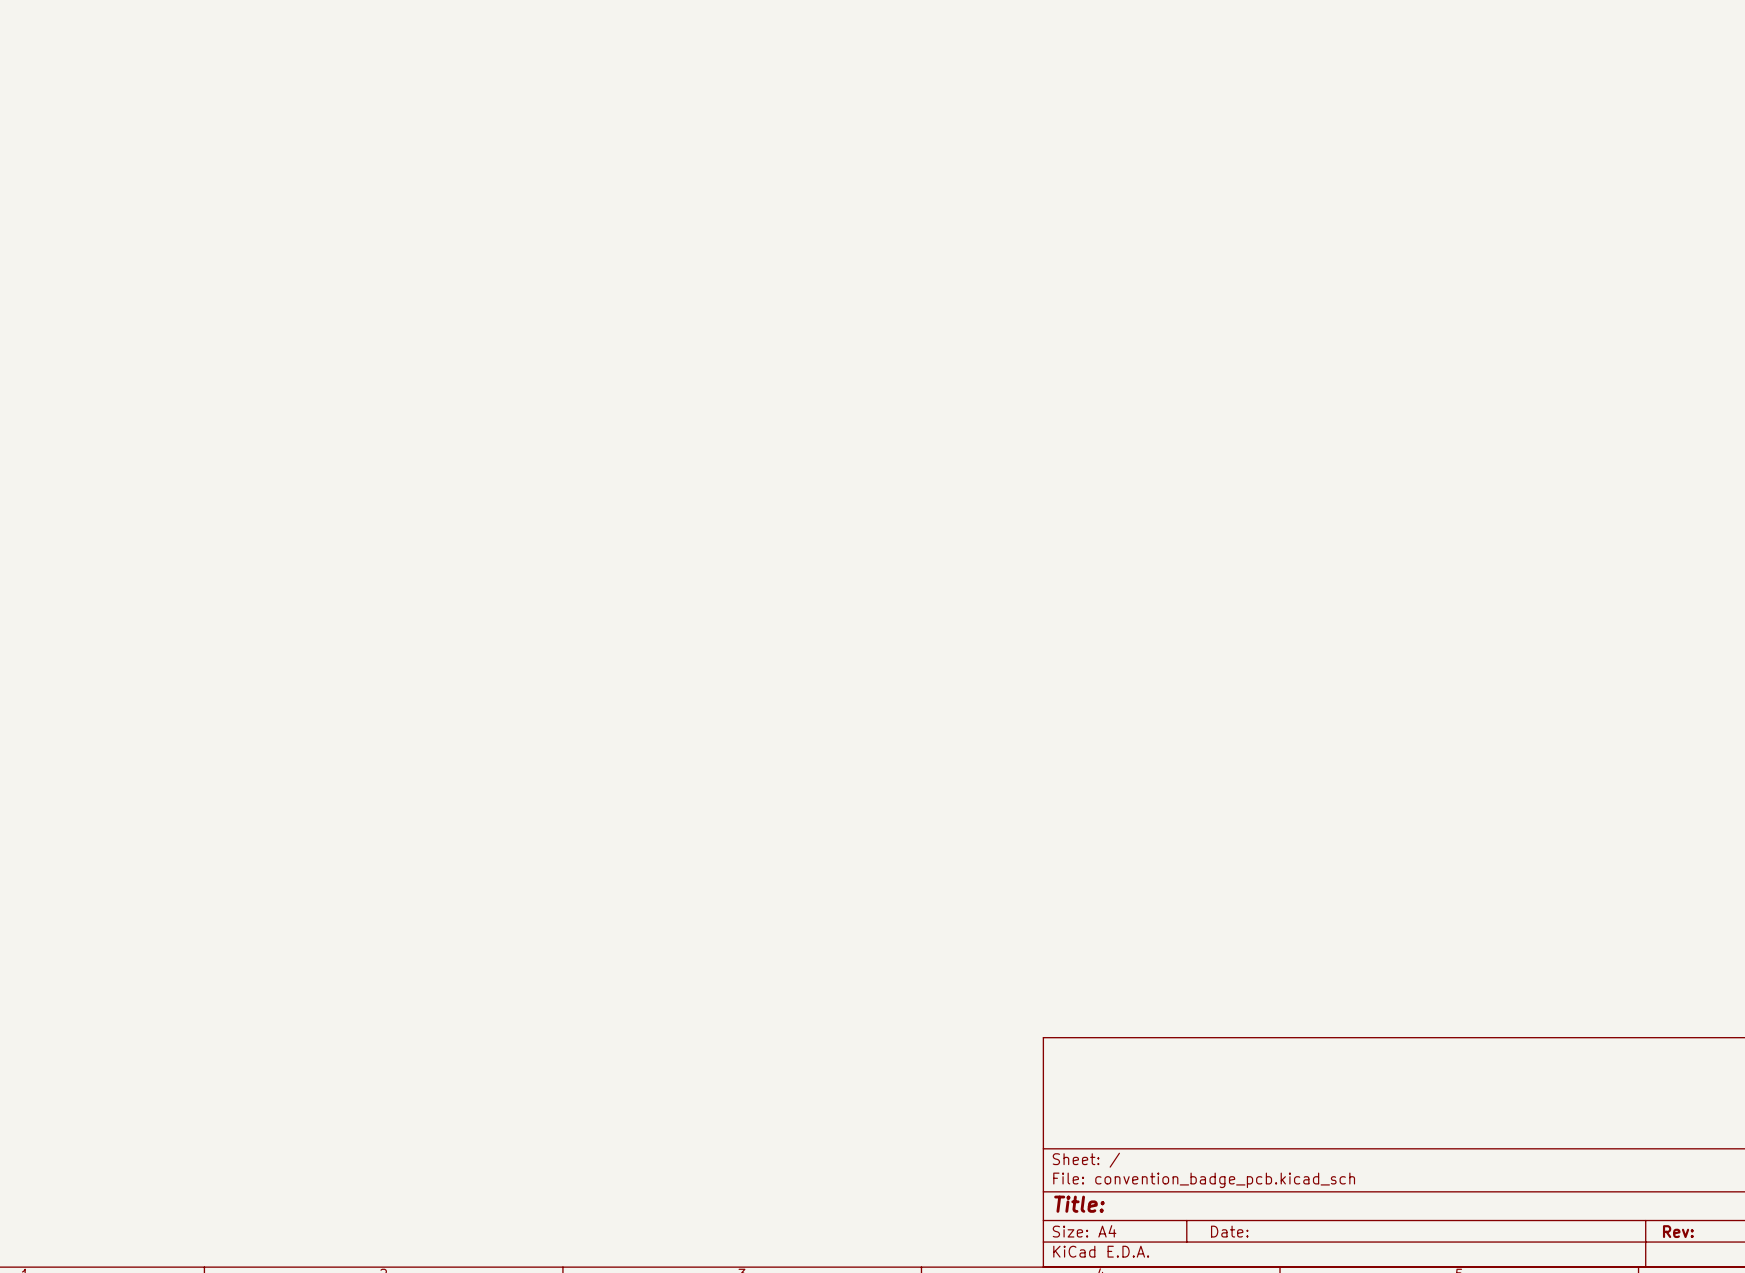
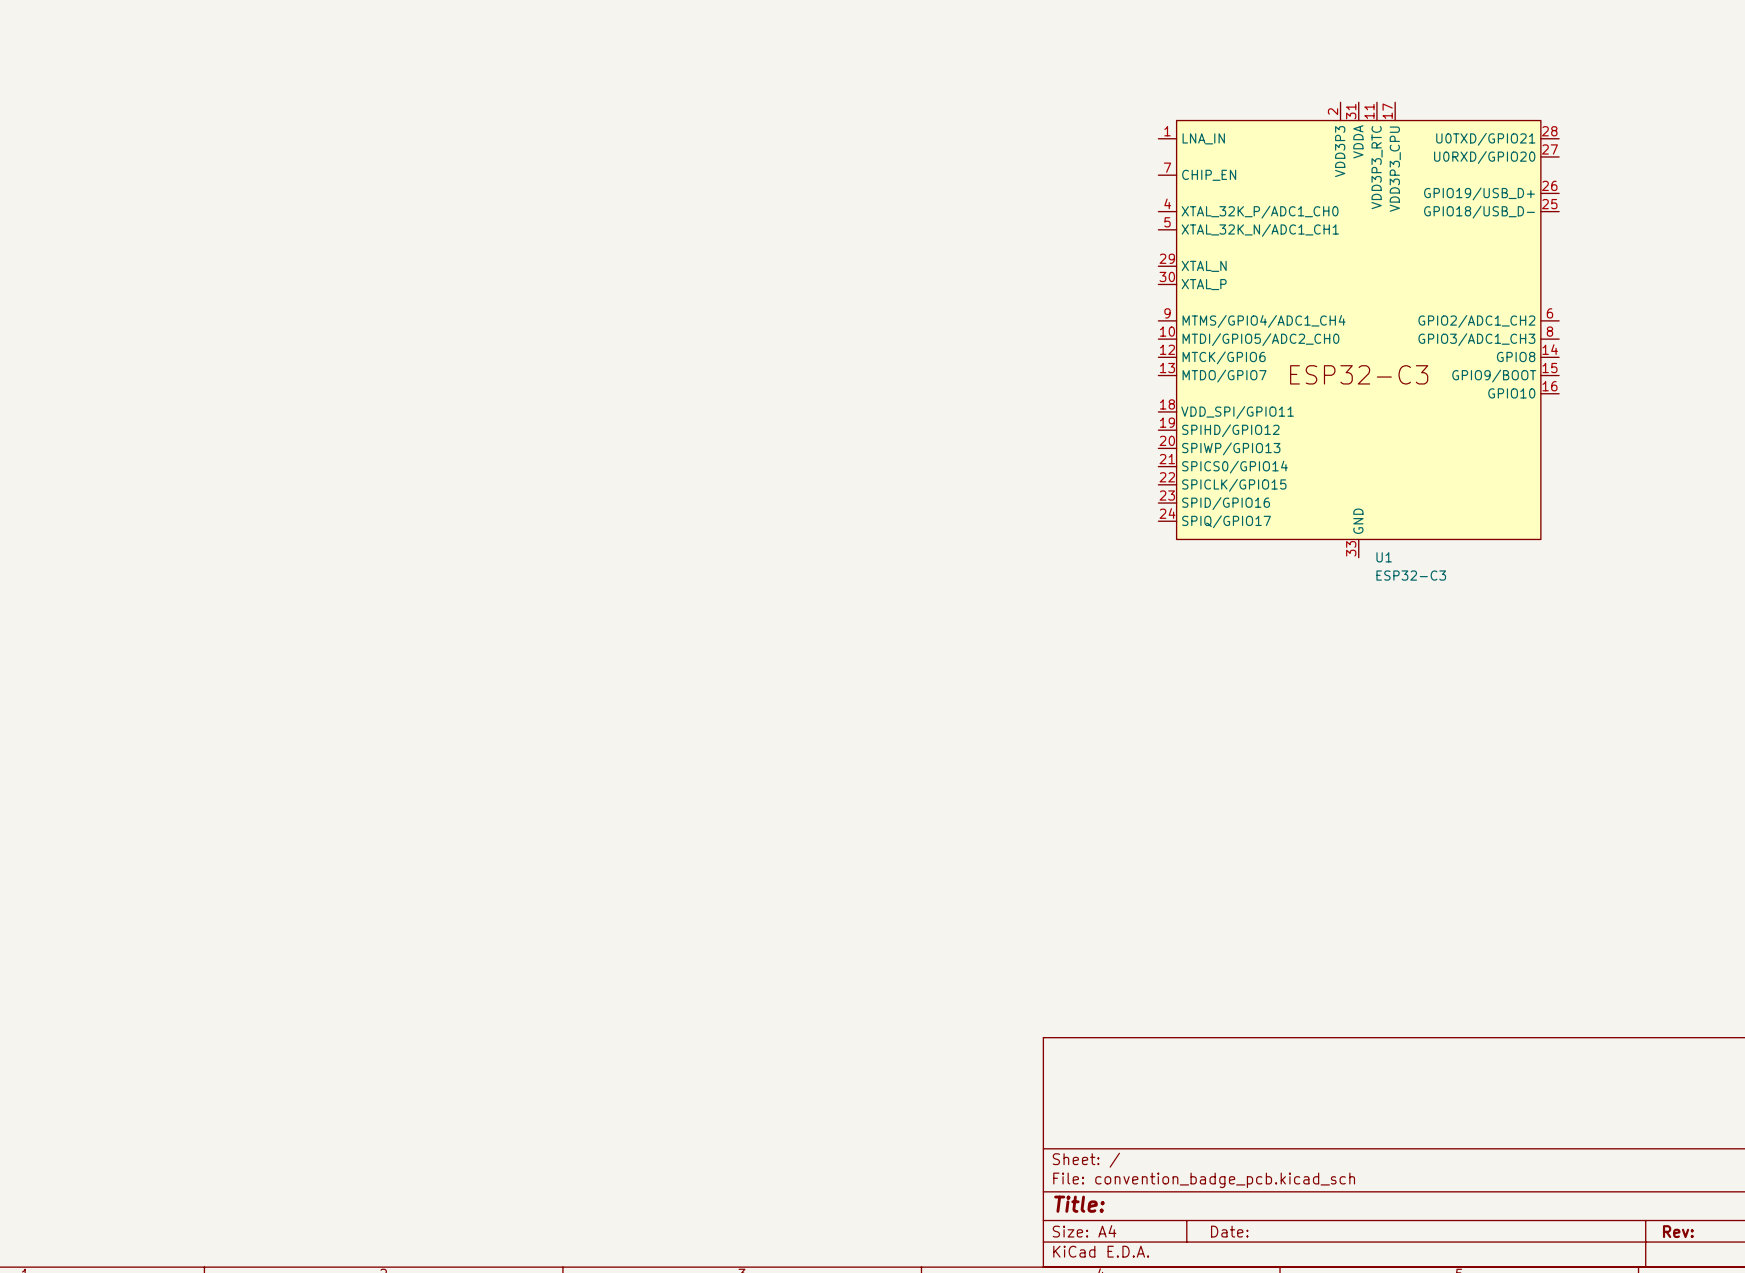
U1: none -> ESP32-C3 (1358, 330)

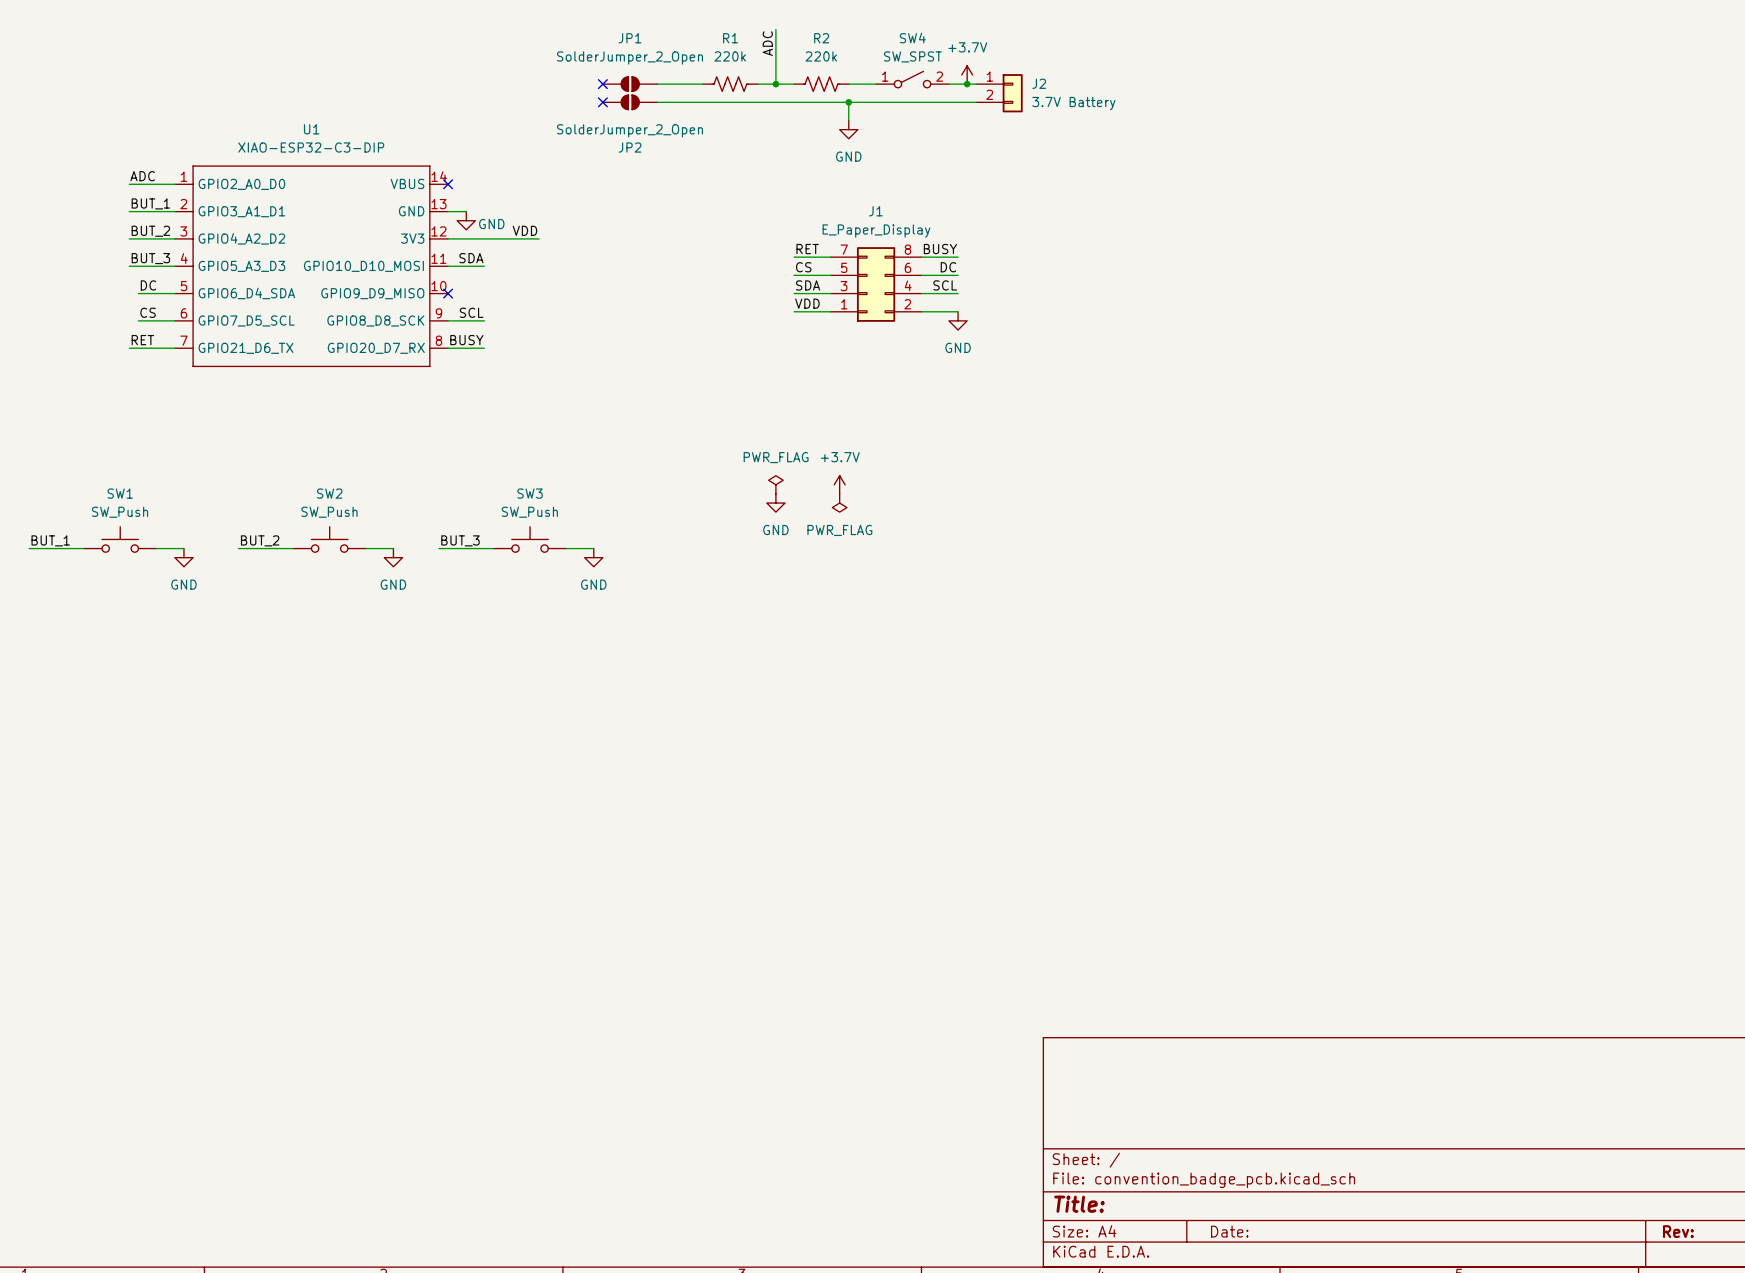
wire: none -> (775, 29) (775, 84)
label: none -> ADC (767, 43)
power symbol: none -> +3.7V (967, 75)
SW4: none -> SW_SPST (912, 79)
no-connect mark: none -> (602, 84)
JP1: none -> SolderJumper_2_Open (630, 84)
wire: none -> (657, 84) (703, 84)
R1: none -> 220k (730, 84)
wire: none -> (757, 84) (794, 84)
junction: none -> (775, 84)
R2: none -> 220k (821, 84)
wire: none -> (848, 84) (876, 84)
wire: none -> (948, 84) (976, 84)
junction: none -> (967, 84)
J2: none -> 3.7V Battery (999, 93)
no-connect mark: none -> (602, 102)
JP2: none -> SolderJumper_2_Open (630, 102)
wire: none -> (657, 102) (976, 102)
wire: none -> (848, 102) (848, 120)
junction: none -> (848, 102)
U1 symbol: [1158, 102, 1560, 558] -> [174, 165, 449, 367]
power symbol: none -> GND (848, 129)
label: none -> ADC (142, 176)
wire: none -> (129, 184) (174, 184)
no-connect mark: none -> (448, 184)
label: none -> BUT_1 (150, 203)
wire: none -> (129, 211) (174, 211)
wire: none -> (448, 211) (466, 211)
power symbol: none -> GND (466, 220)
label: none -> VDD (524, 230)
label: none -> BUT_2 (150, 231)
wire: none -> (129, 238) (174, 238)
wire: none -> (448, 238) (539, 238)
label: none -> RET (807, 249)
label: none -> BUSY (940, 249)
wire: none -> (794, 257) (830, 257)
wire: none -> (921, 257) (958, 257)
label: none -> BUT_3 (150, 258)
label: none -> SDA (471, 258)
wire: none -> (129, 266) (174, 266)
wire: none -> (448, 266) (484, 266)
label: none -> CS (803, 267)
label: none -> DC (948, 267)
wire: none -> (794, 275) (830, 275)
wire: none -> (921, 275) (958, 275)
J1: none -> E_Paper_Display (876, 284)
label: none -> DC (148, 285)
label: none -> SDA (808, 285)
label: none -> SCL (945, 285)
wire: none -> (138, 293) (174, 293)
no-connect mark: none -> (448, 293)
wire: none -> (794, 293) (830, 293)
wire: none -> (921, 293) (958, 293)
label: none -> VDD (807, 303)
wire: none -> (794, 311) (830, 311)
wire: none -> (921, 311) (958, 311)
label: none -> CS (148, 312)
label: none -> SCL (471, 312)
wire: none -> (138, 320) (174, 320)
wire: none -> (448, 320) (484, 320)
power symbol: none -> GND (958, 320)
label: none -> RET (142, 340)
label: none -> BUSY (466, 340)
wire: none -> (129, 348) (174, 348)
wire: none -> (448, 348) (484, 348)
power symbol: none -> PWR_FLAG (775, 484)
power symbol: none -> +3.7V (839, 484)
power symbol: none -> GND (775, 503)
power symbol: none -> PWR_FLAG (839, 503)
SW1: none -> SW_Push (120, 539)
SW2: none -> SW_Push (329, 539)
SW3: none -> SW_Push (530, 539)
label: none -> BUT_1 (50, 540)
label: none -> BUT_2 (260, 540)
label: none -> BUT_3 (460, 540)
wire: none -> (29, 548) (83, 548)
wire: none -> (156, 548) (183, 548)
wire: none -> (238, 548) (293, 548)
wire: none -> (366, 548) (393, 548)
wire: none -> (438, 548) (493, 548)
wire: none -> (566, 548) (593, 548)
power symbol: none -> GND (183, 557)
power symbol: none -> GND (393, 557)
power symbol: none -> GND (593, 557)
U1 name position: U1 (1384, 557) -> U1 (311, 129)
U1 value: ESP32-C3 (1411, 575) -> XIAO-ESP32-C3-DIP (311, 147)

